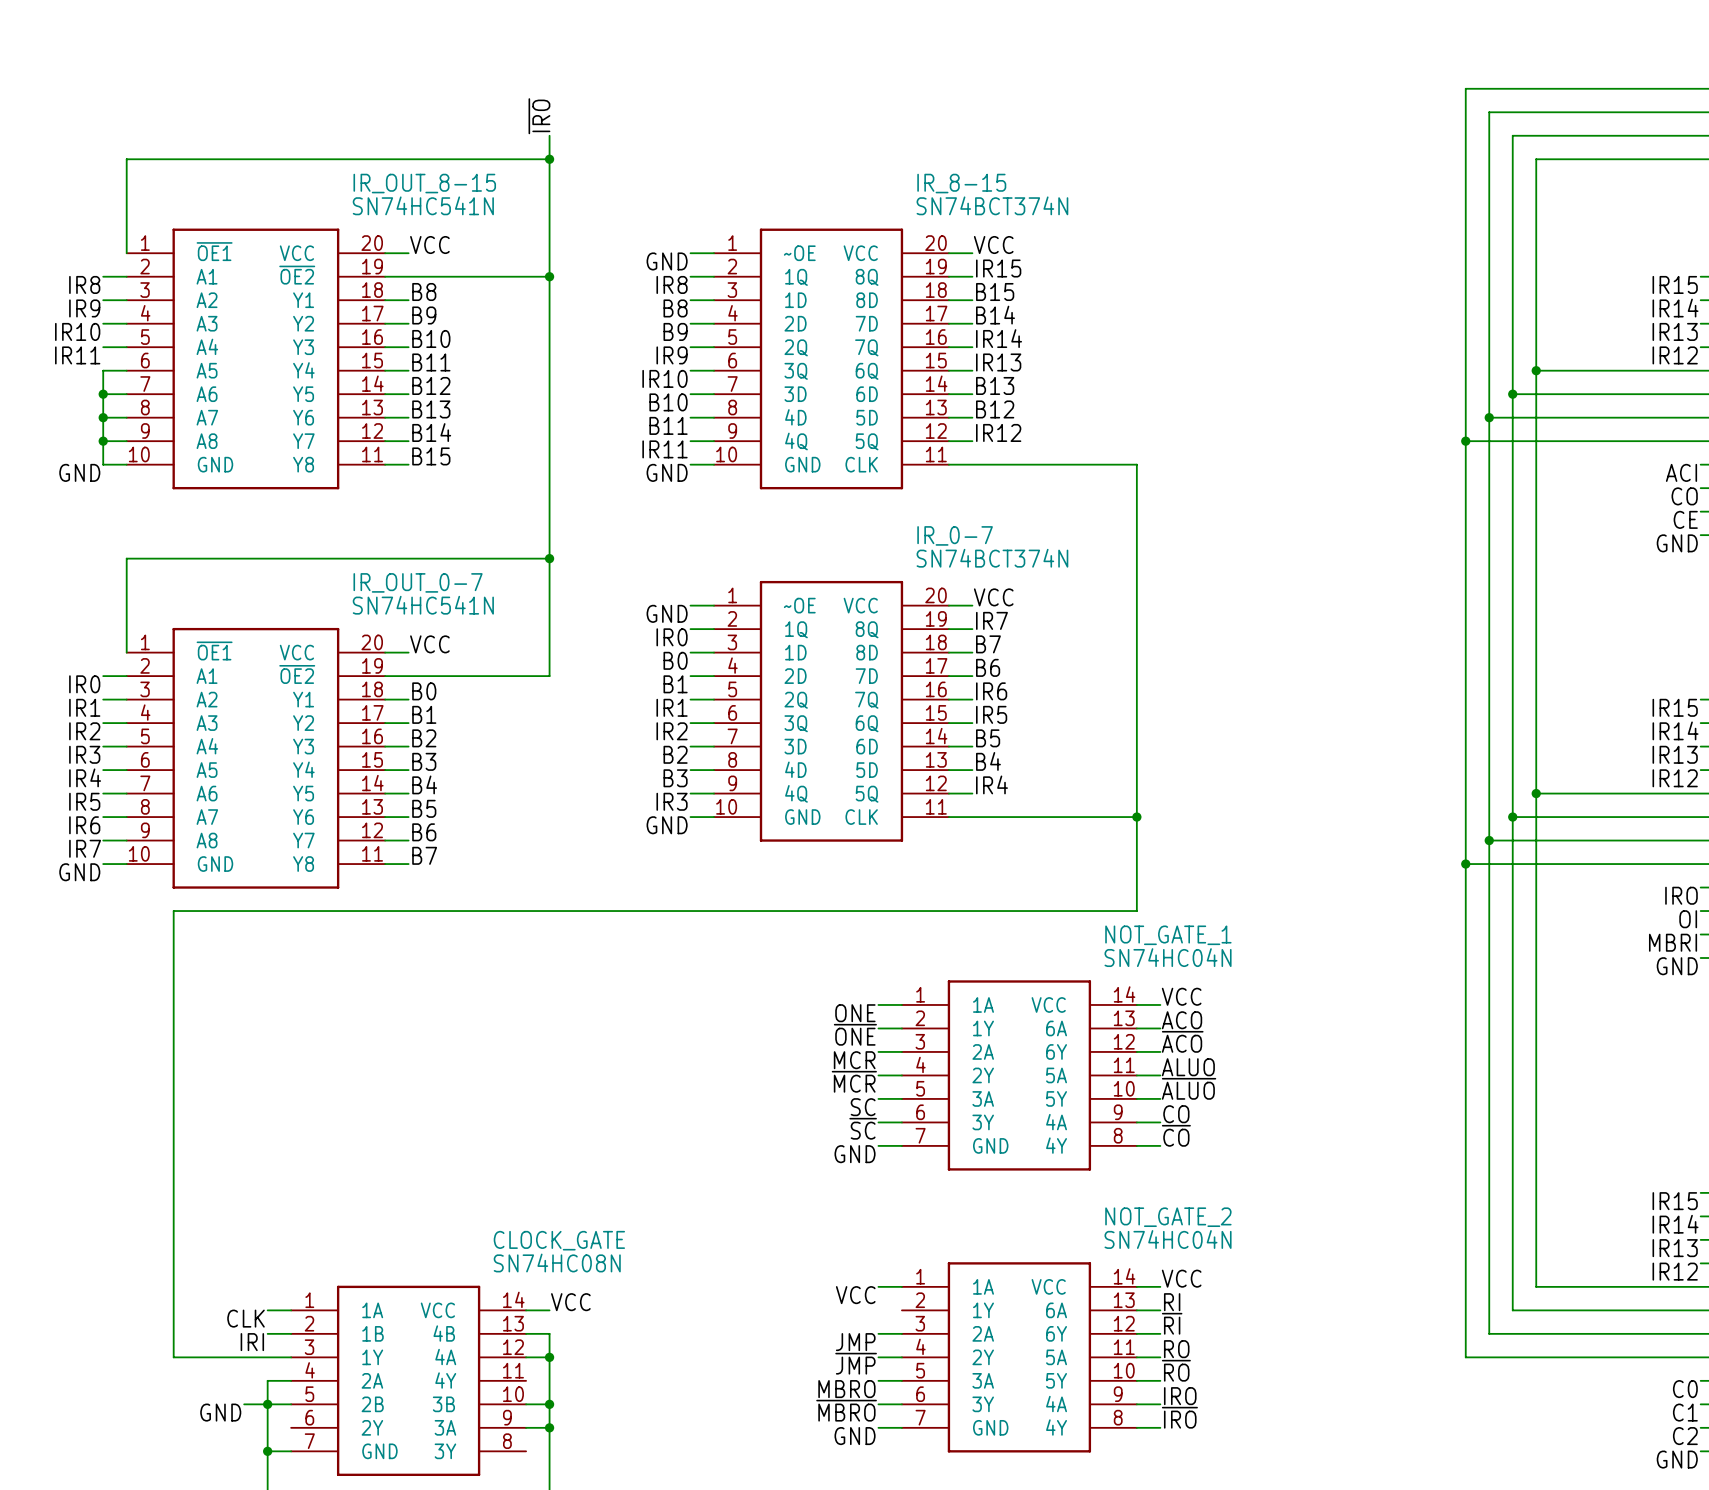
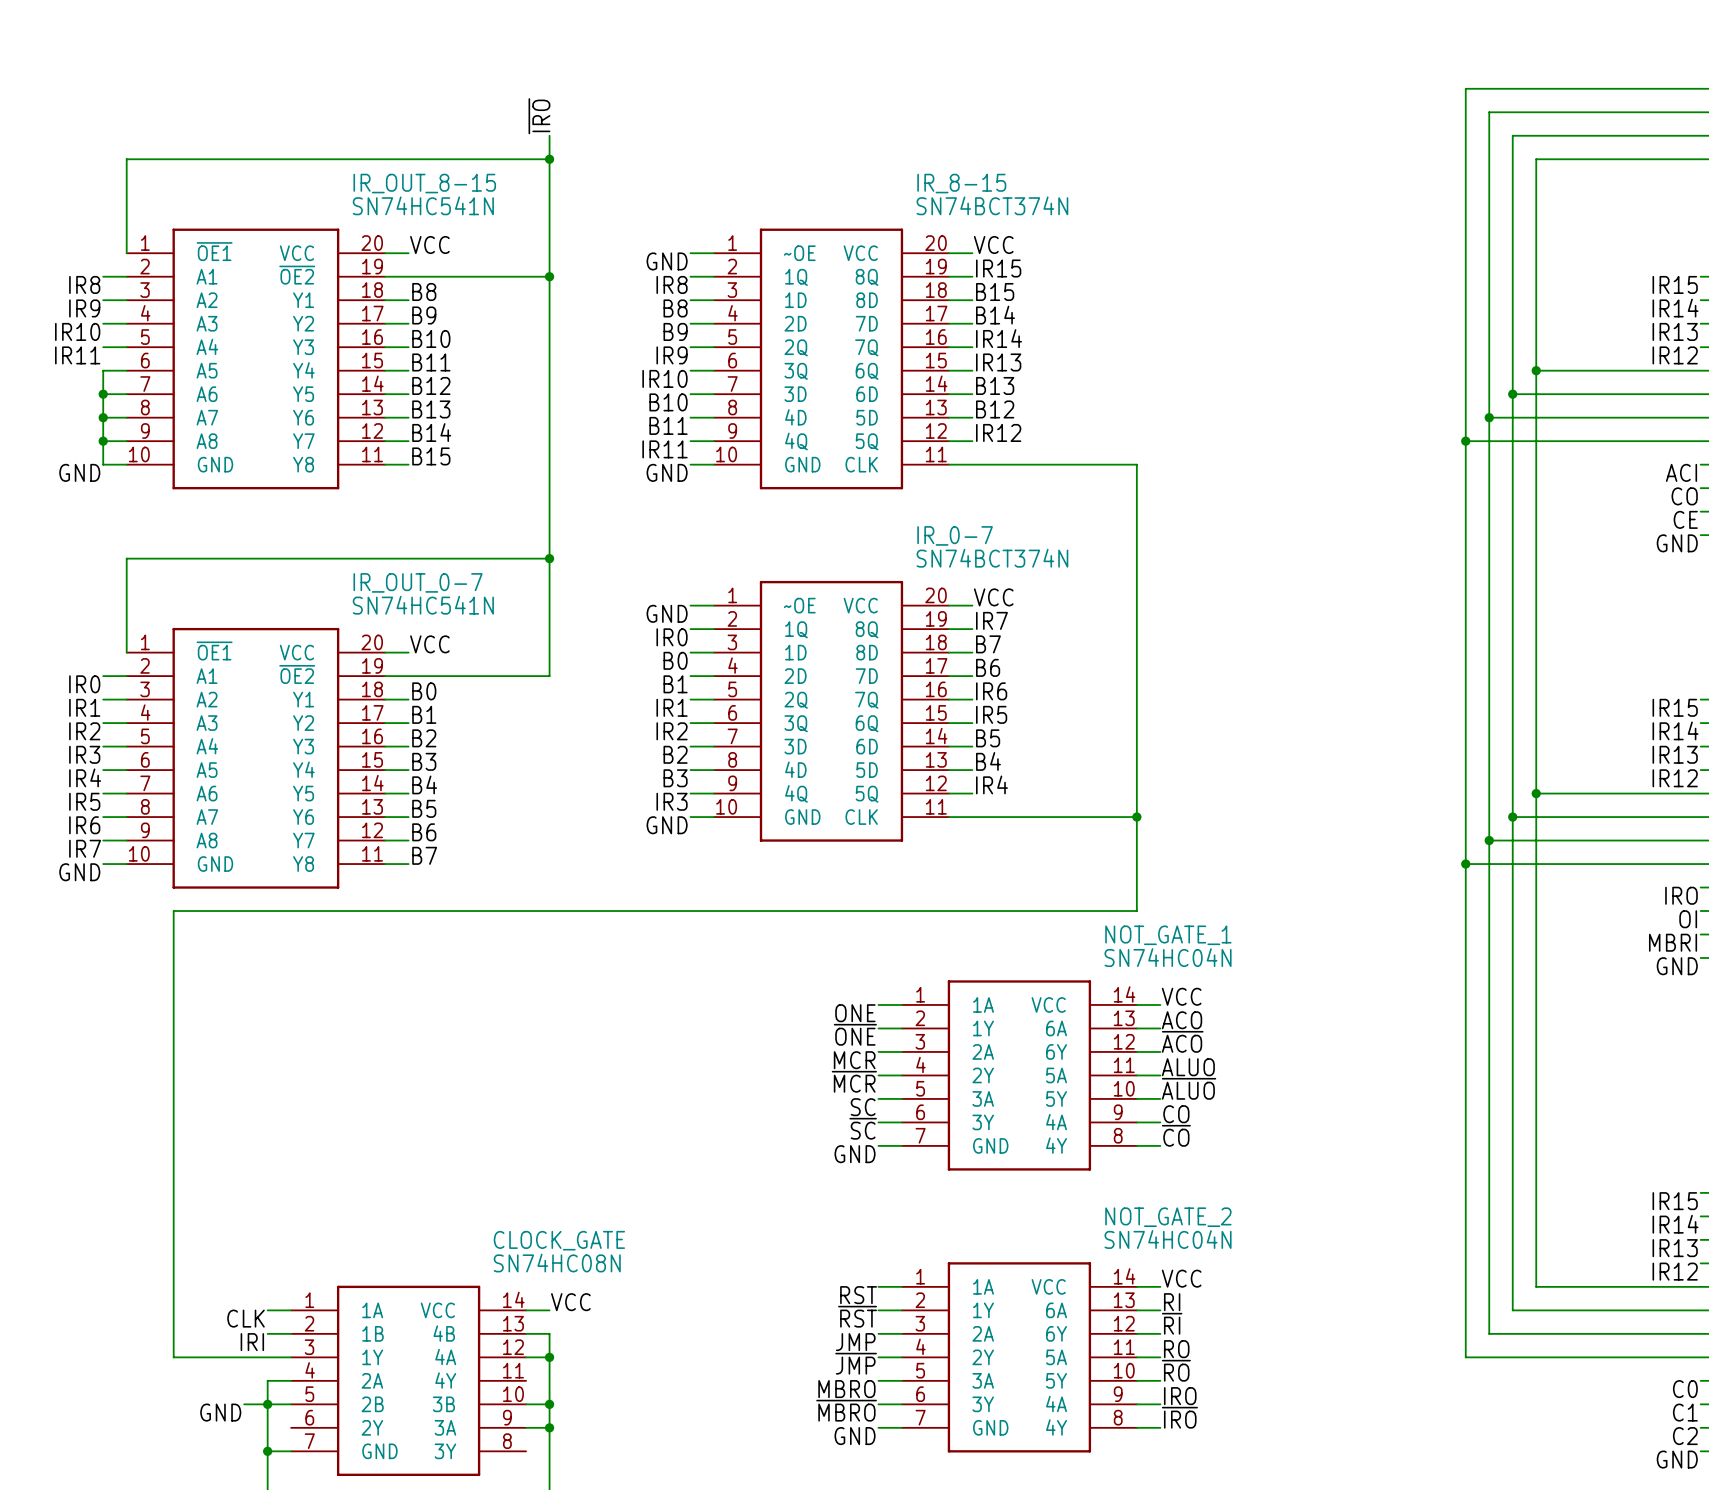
label: VCC (855, 1295) -> RST (858, 1295)
wire: none -> (878, 1310) (901, 1310)
label: none -> ~{RST} (857, 1316)

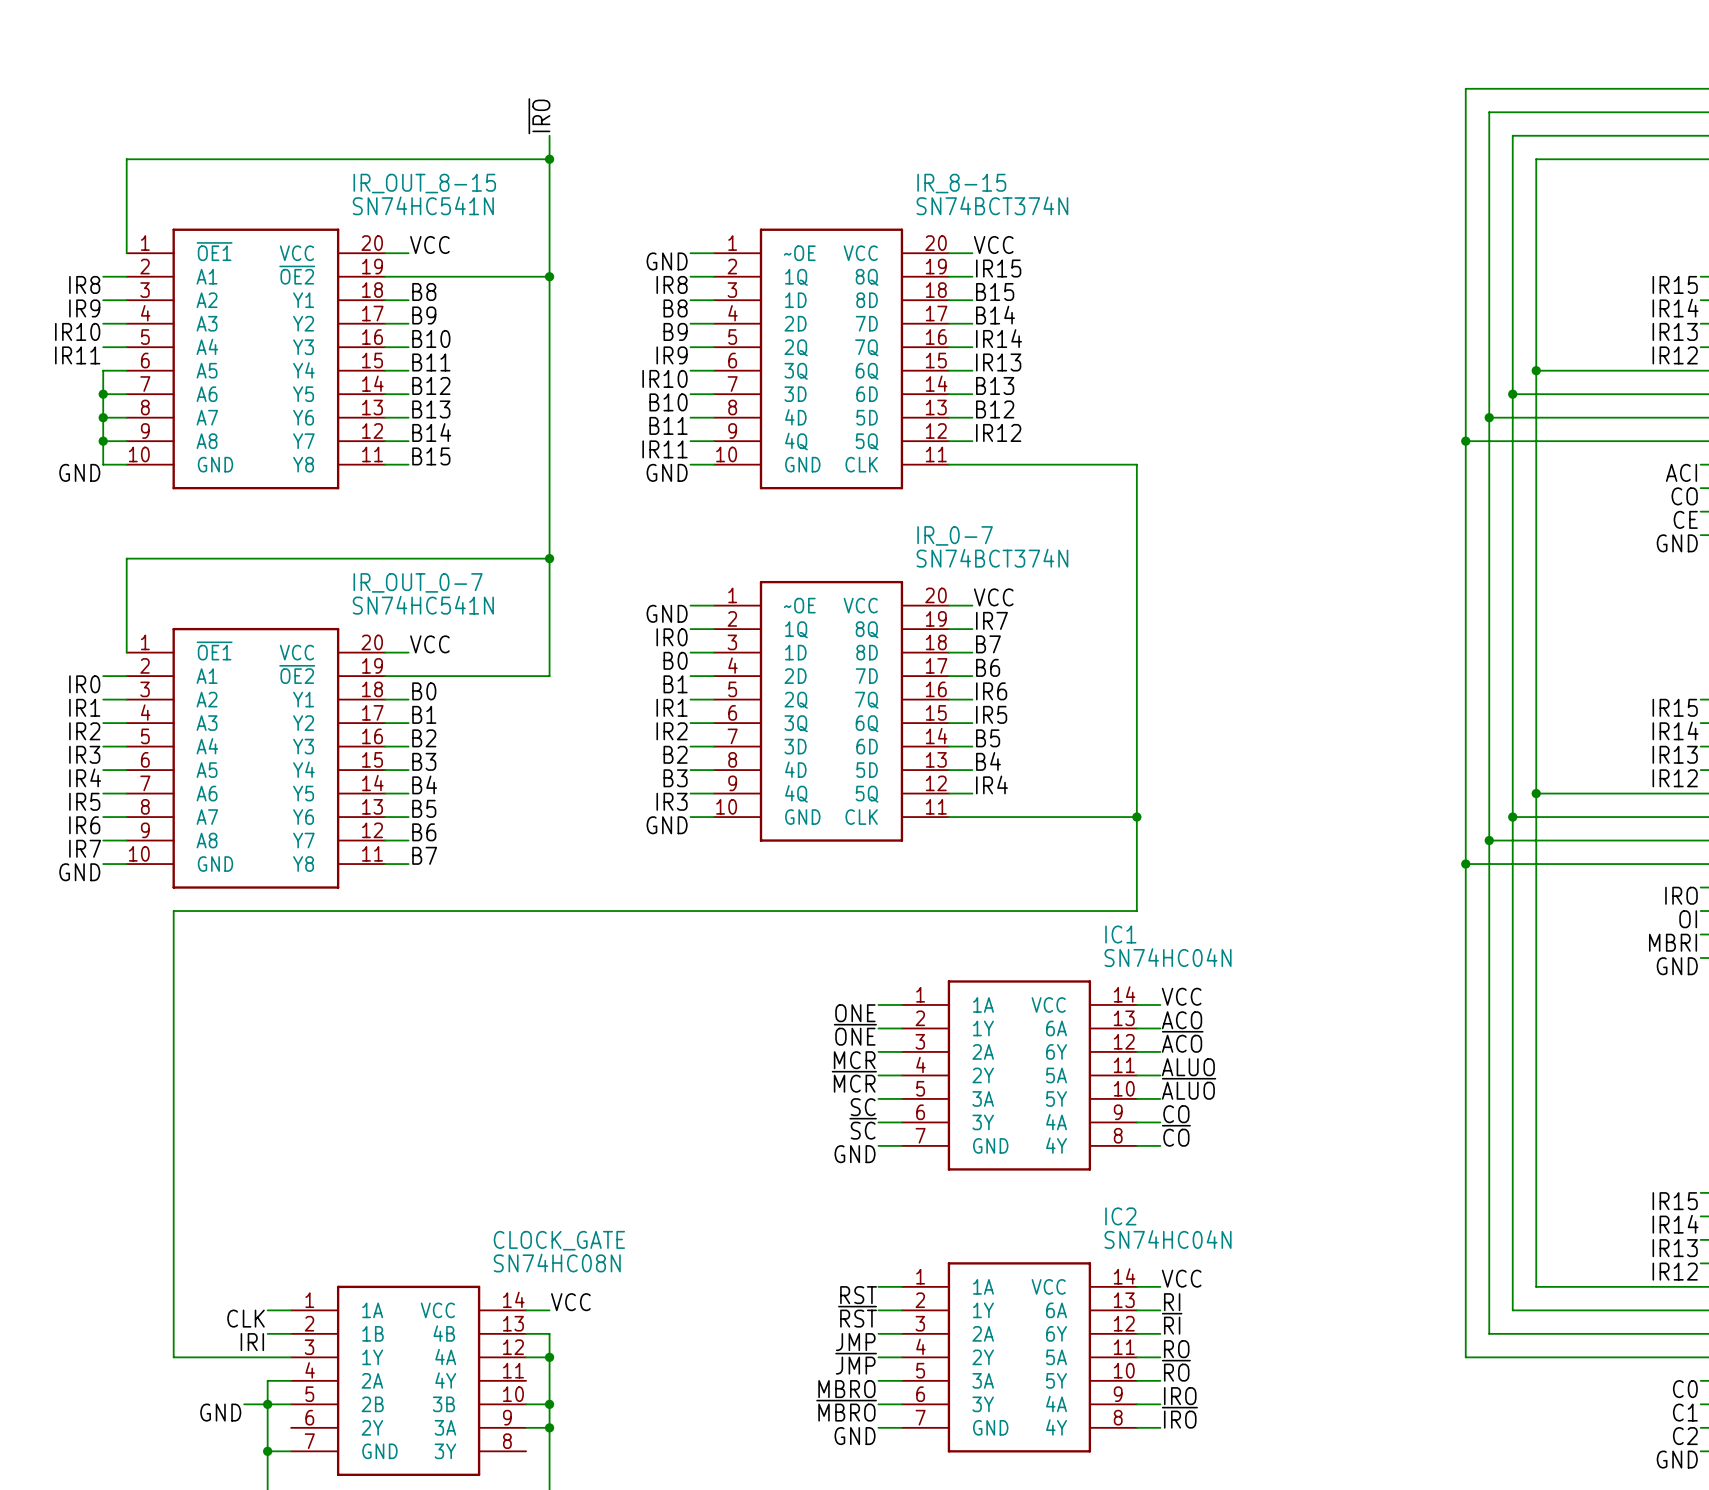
NOT_GATE_1 name: NOT_GATE_1 (1168, 935) -> IC1 (1120, 934)
NOT_GATE_2 name: NOT_GATE_2 (1168, 1217) -> IC2 (1120, 1216)

